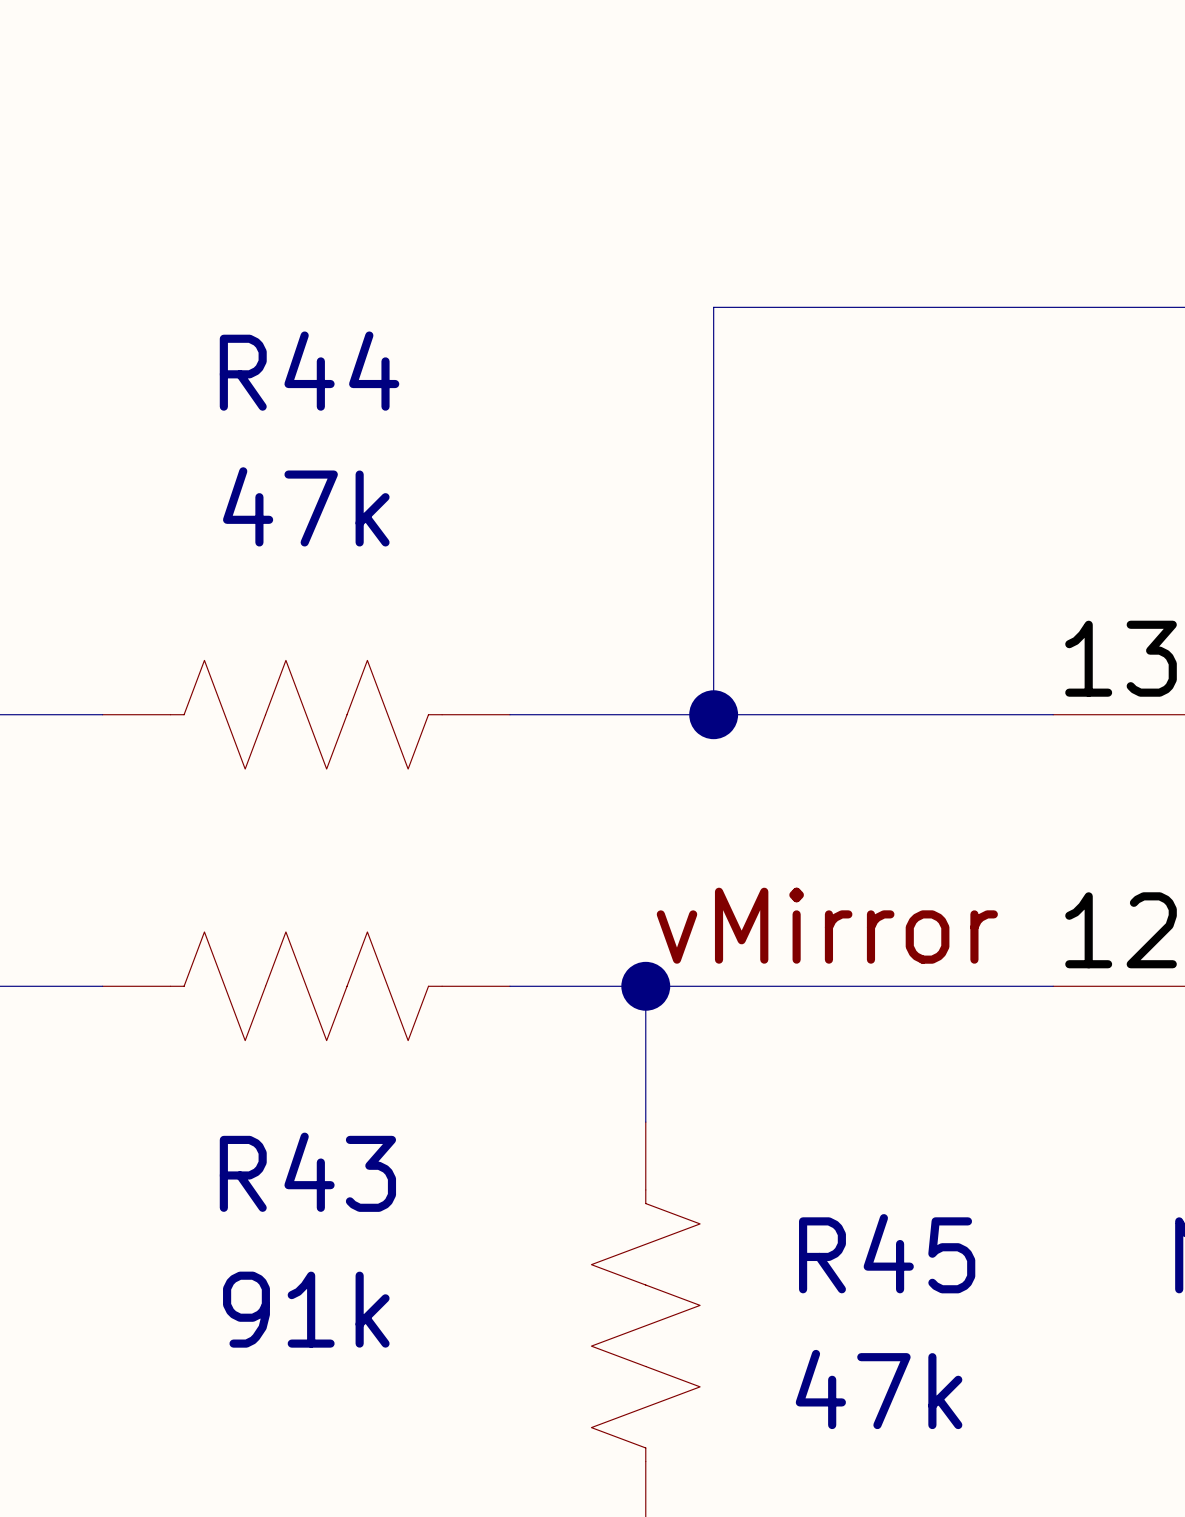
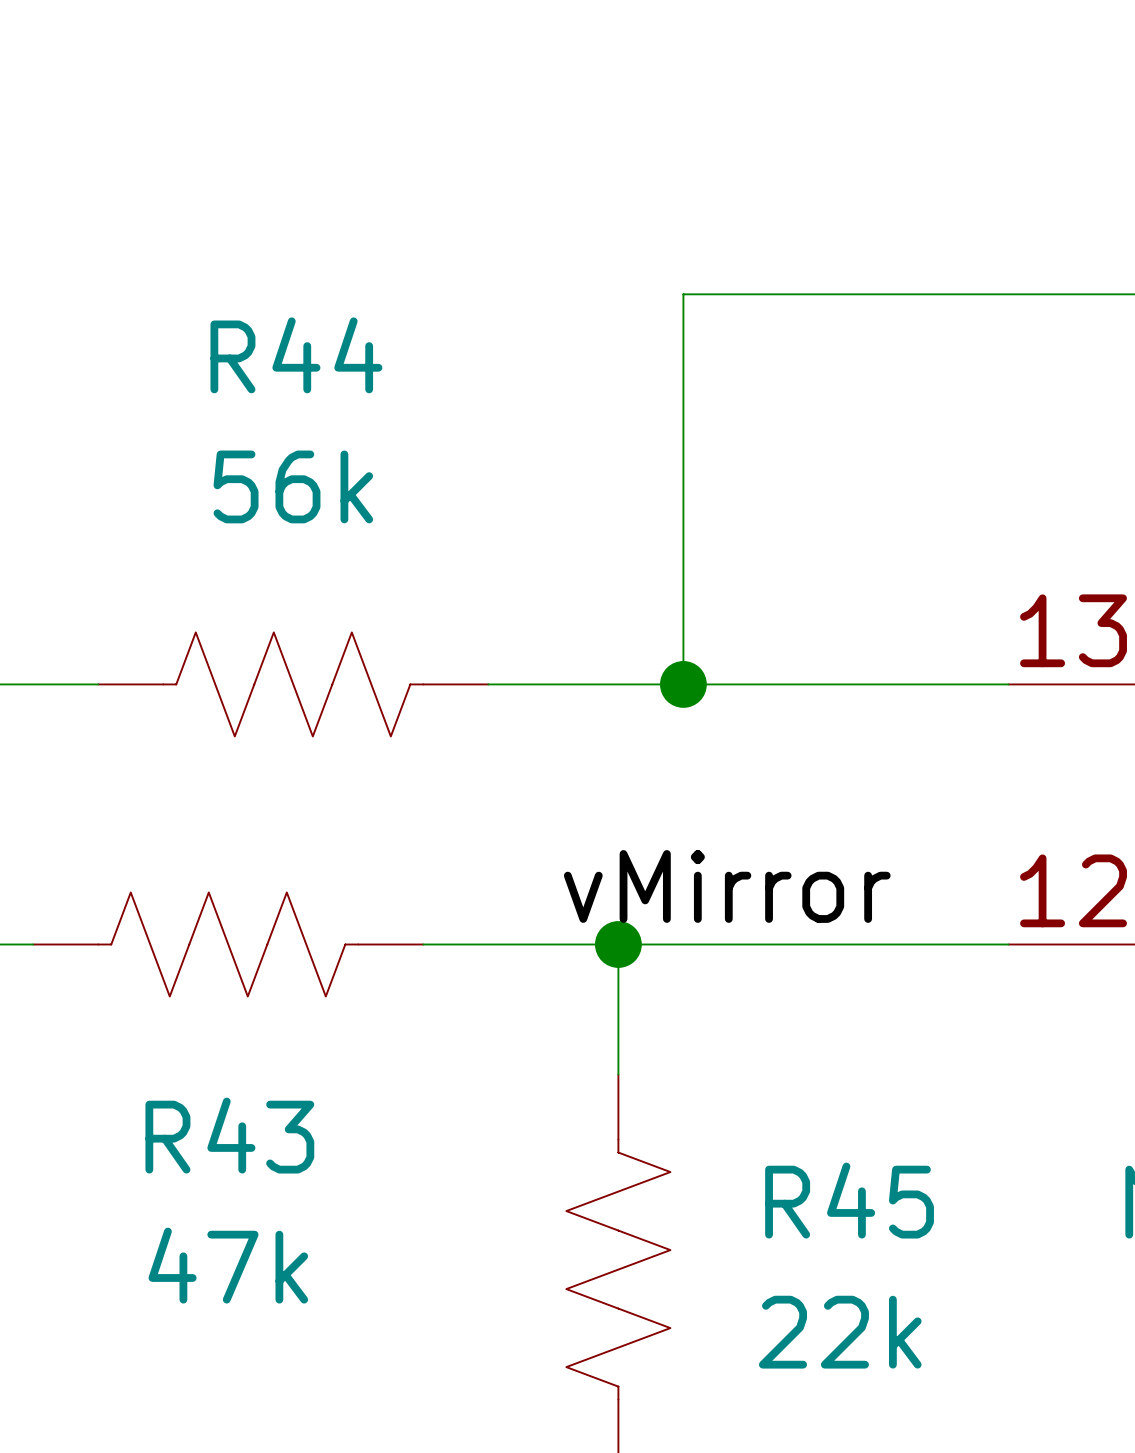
R44 value: 47k (306, 506) -> 56k (293, 486)
label position: vMirror (827, 925) -> vMirror (727, 886)
R43 position: (306, 986) -> (228, 944)
R43 name position: R43 (307, 1172) -> R43 (229, 1135)
R43 value: 91k (306, 1309) -> 47k (228, 1265)
R45 value: 47k (879, 1389) -> 22k (840, 1332)

